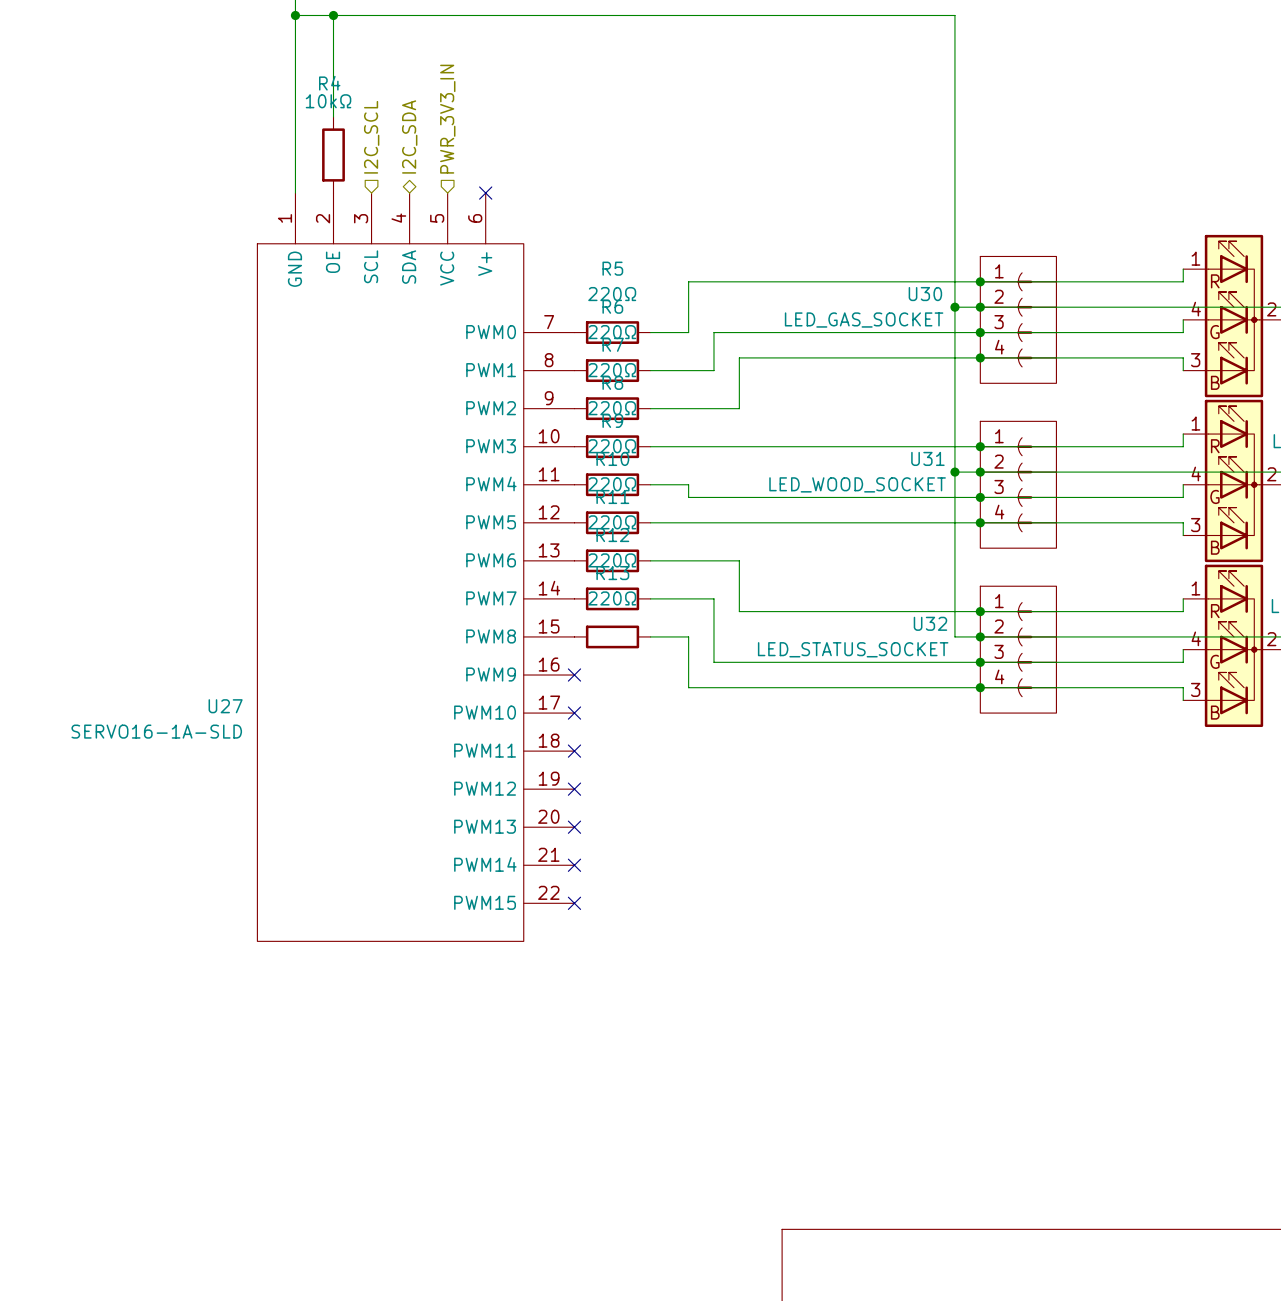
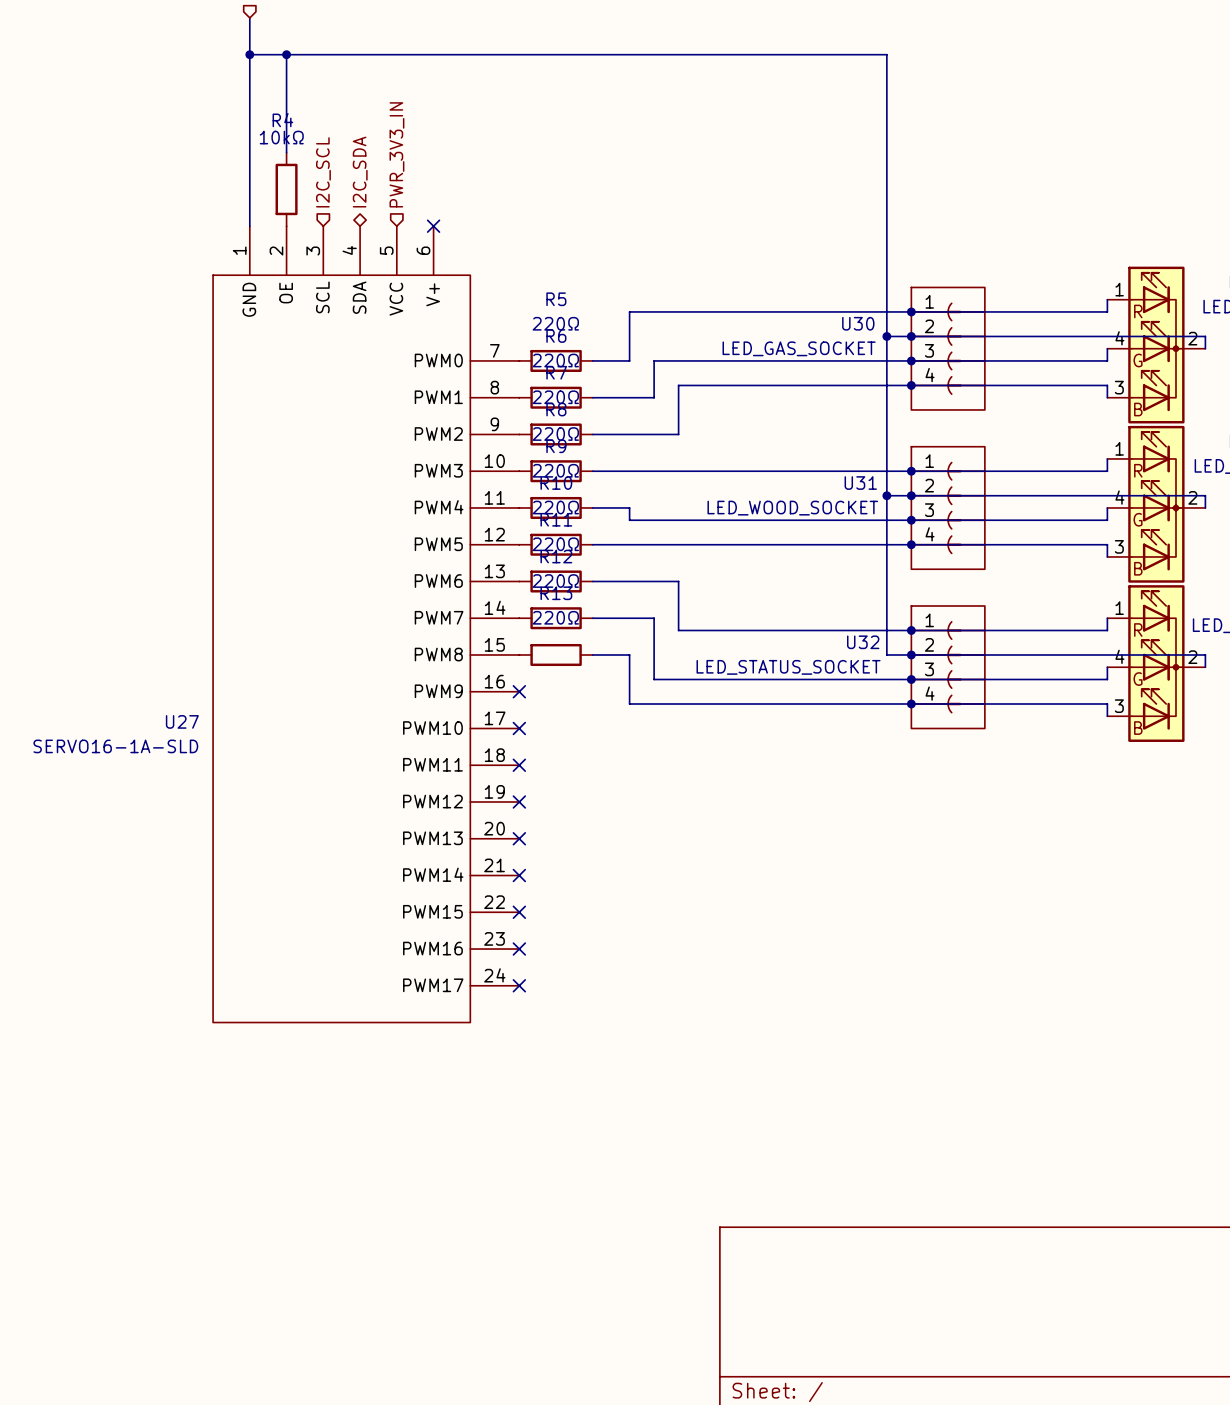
U27 symbol: [257, 193, 575, 942] -> [213, 226, 520, 1023]
no-connect mark: none -> (519, 949)
no-connect mark: none -> (519, 985)

